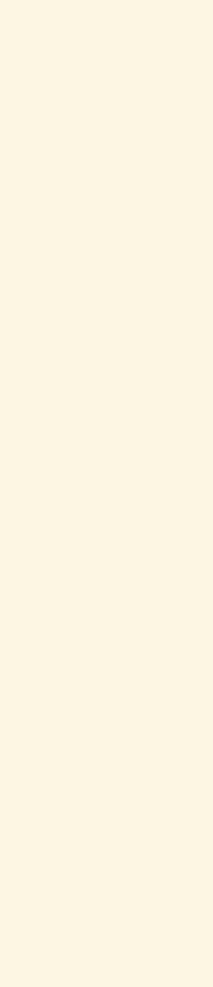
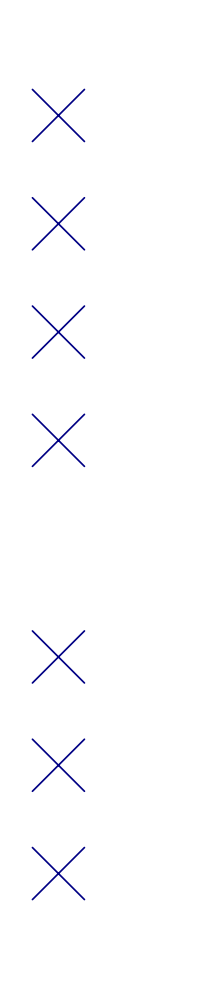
no-connect mark: none -> (58, 115)
no-connect mark: none -> (58, 223)
no-connect mark: none -> (58, 332)
no-connect mark: none -> (58, 440)
no-connect mark: none -> (58, 656)
no-connect mark: none -> (58, 765)
no-connect mark: none -> (58, 873)

